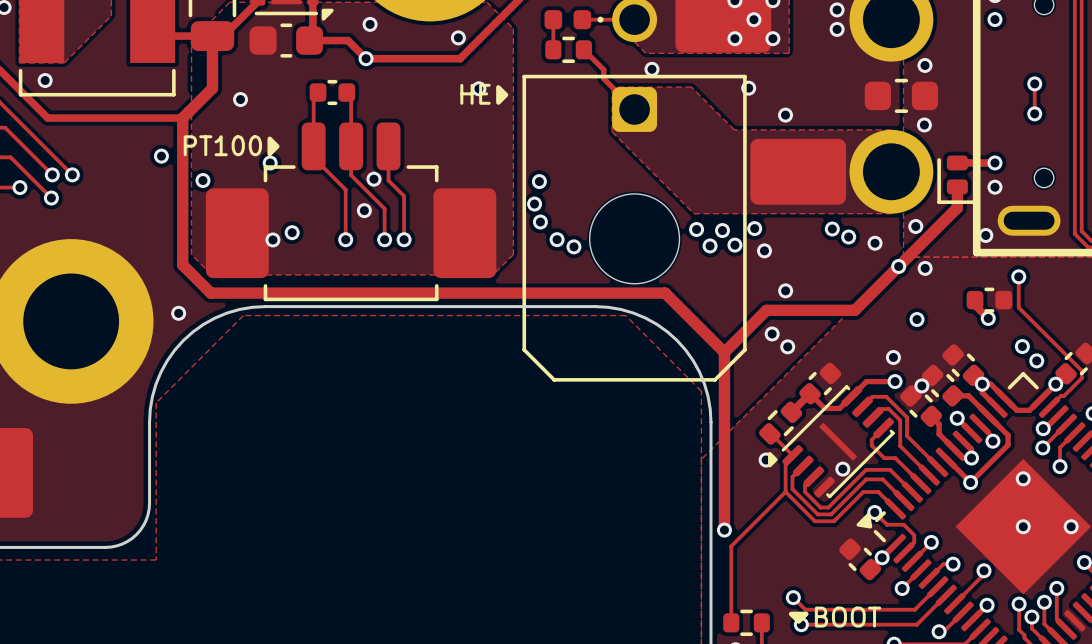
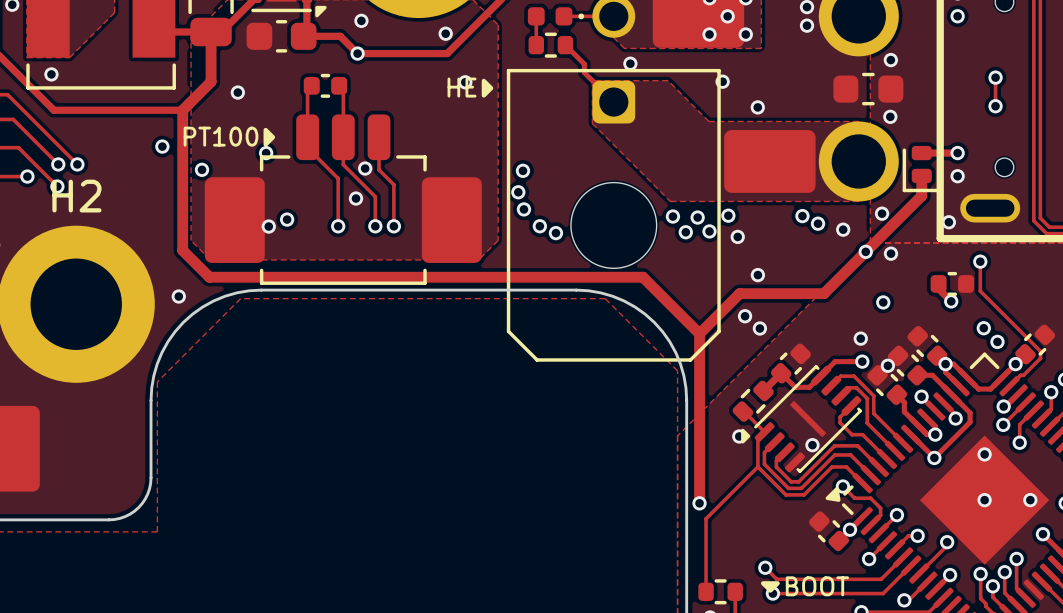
H2 name: none -> H2 (76, 196)

